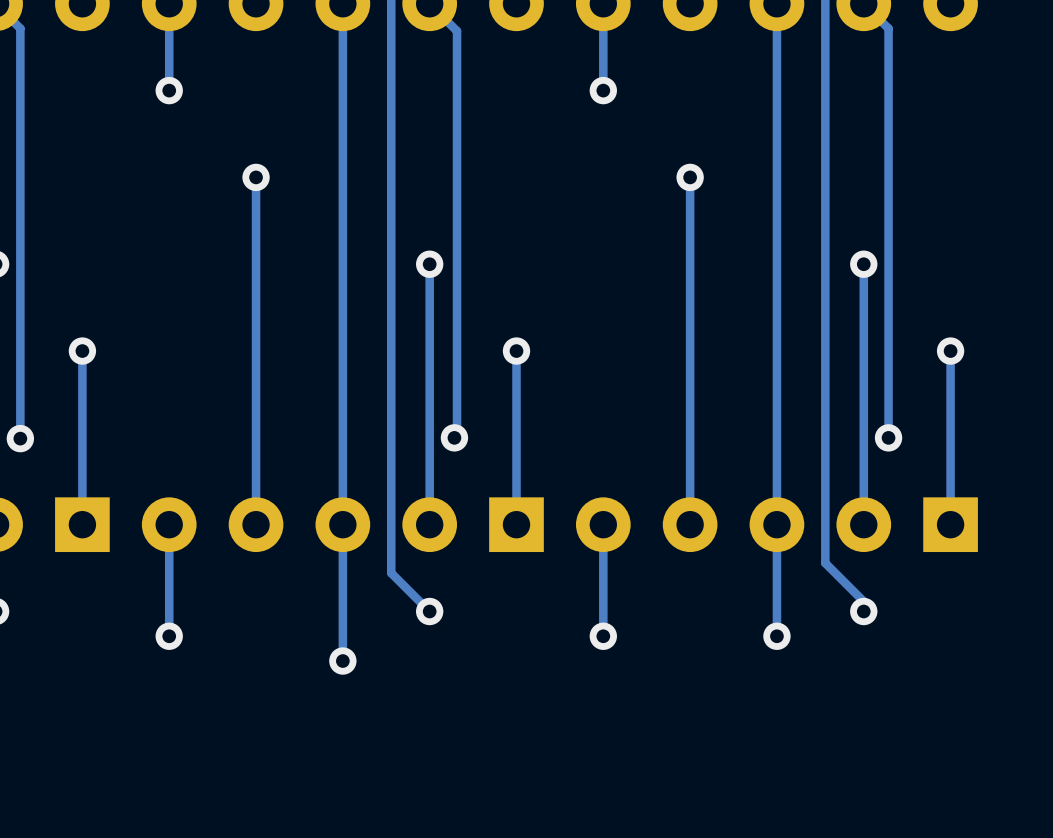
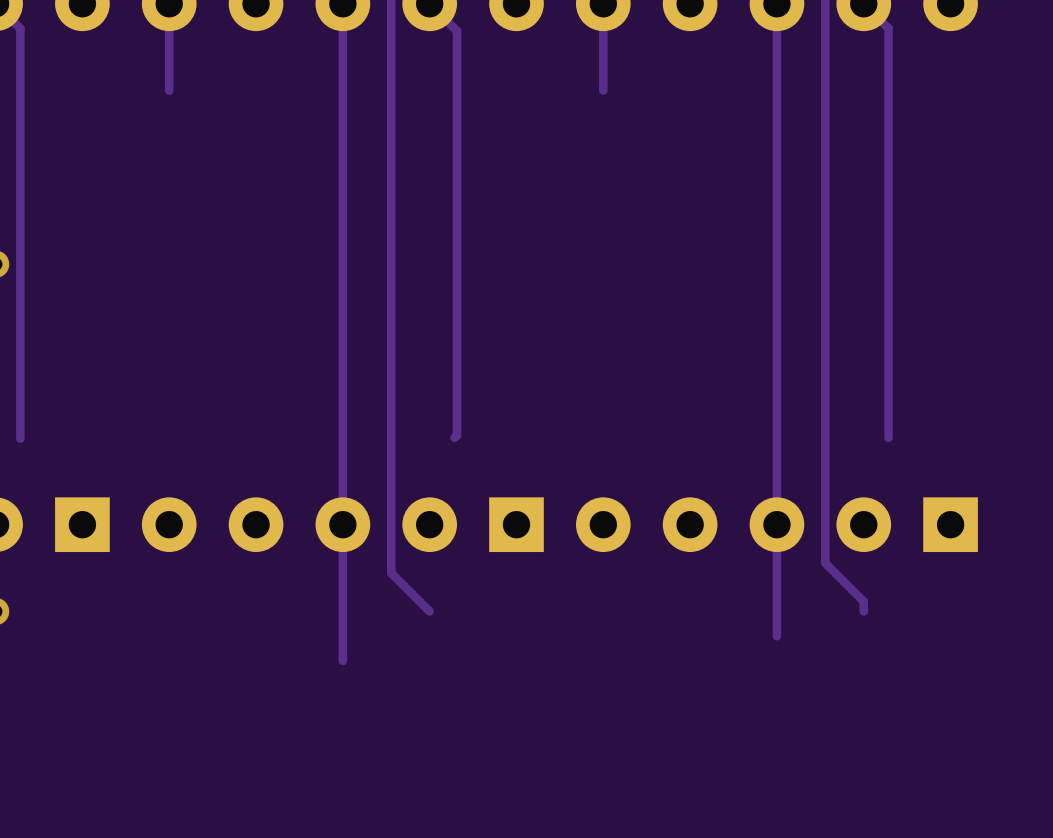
via: (169, 90) -> none
via: (603, 90) -> none
track: (256, 177) (256, 524) -> none
via: (256, 177) -> none
track: (690, 177) (690, 524) -> none
via: (690, 177) -> none
track: (429, 264) (429, 524) -> none
via: (429, 264) -> none
track: (863, 264) (863, 524) -> none
via: (863, 264) -> none
track: (82, 351) (82, 524) -> none
via: (82, 351) -> none
track: (516, 351) (516, 524) -> none
via: (516, 351) -> none
track: (950, 351) (950, 524) -> none
via: (950, 351) -> none
via: (454, 437) -> none
via: (888, 437) -> none
via: (20, 438) -> none
track: (169, 524) (169, 636) -> none
track: (603, 524) (603, 636) -> none
via: (429, 611) -> none
via: (863, 611) -> none
via: (169, 636) -> none
via: (603, 636) -> none
via: (776, 636) -> none
via: (342, 661) -> none

